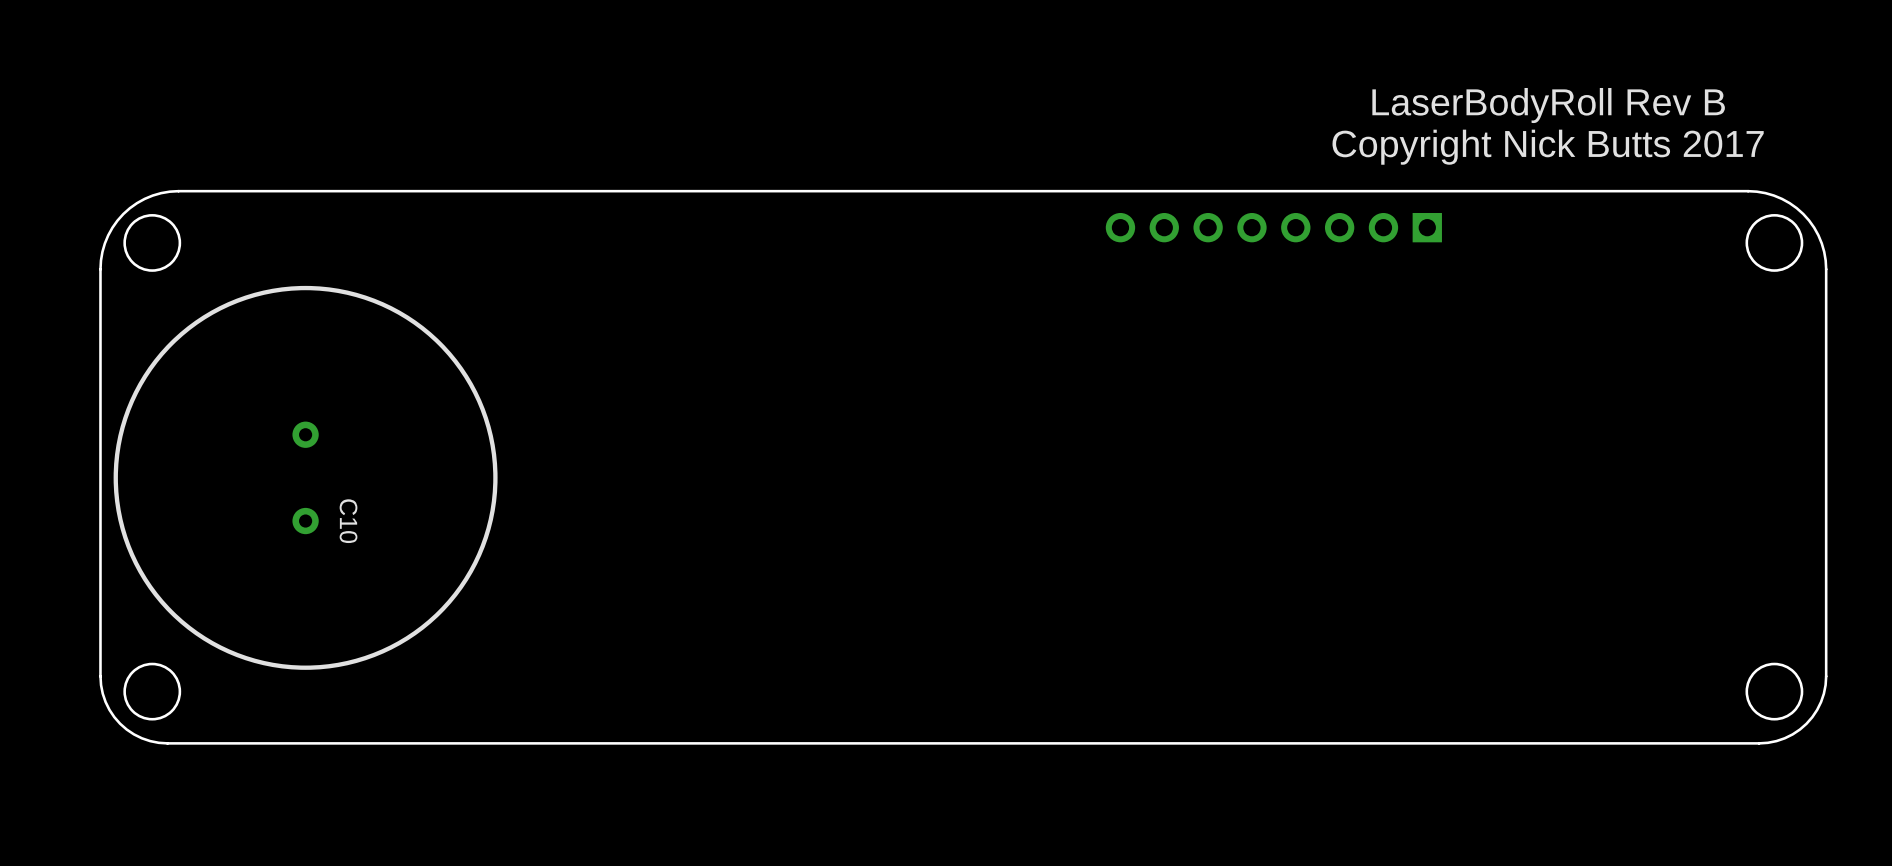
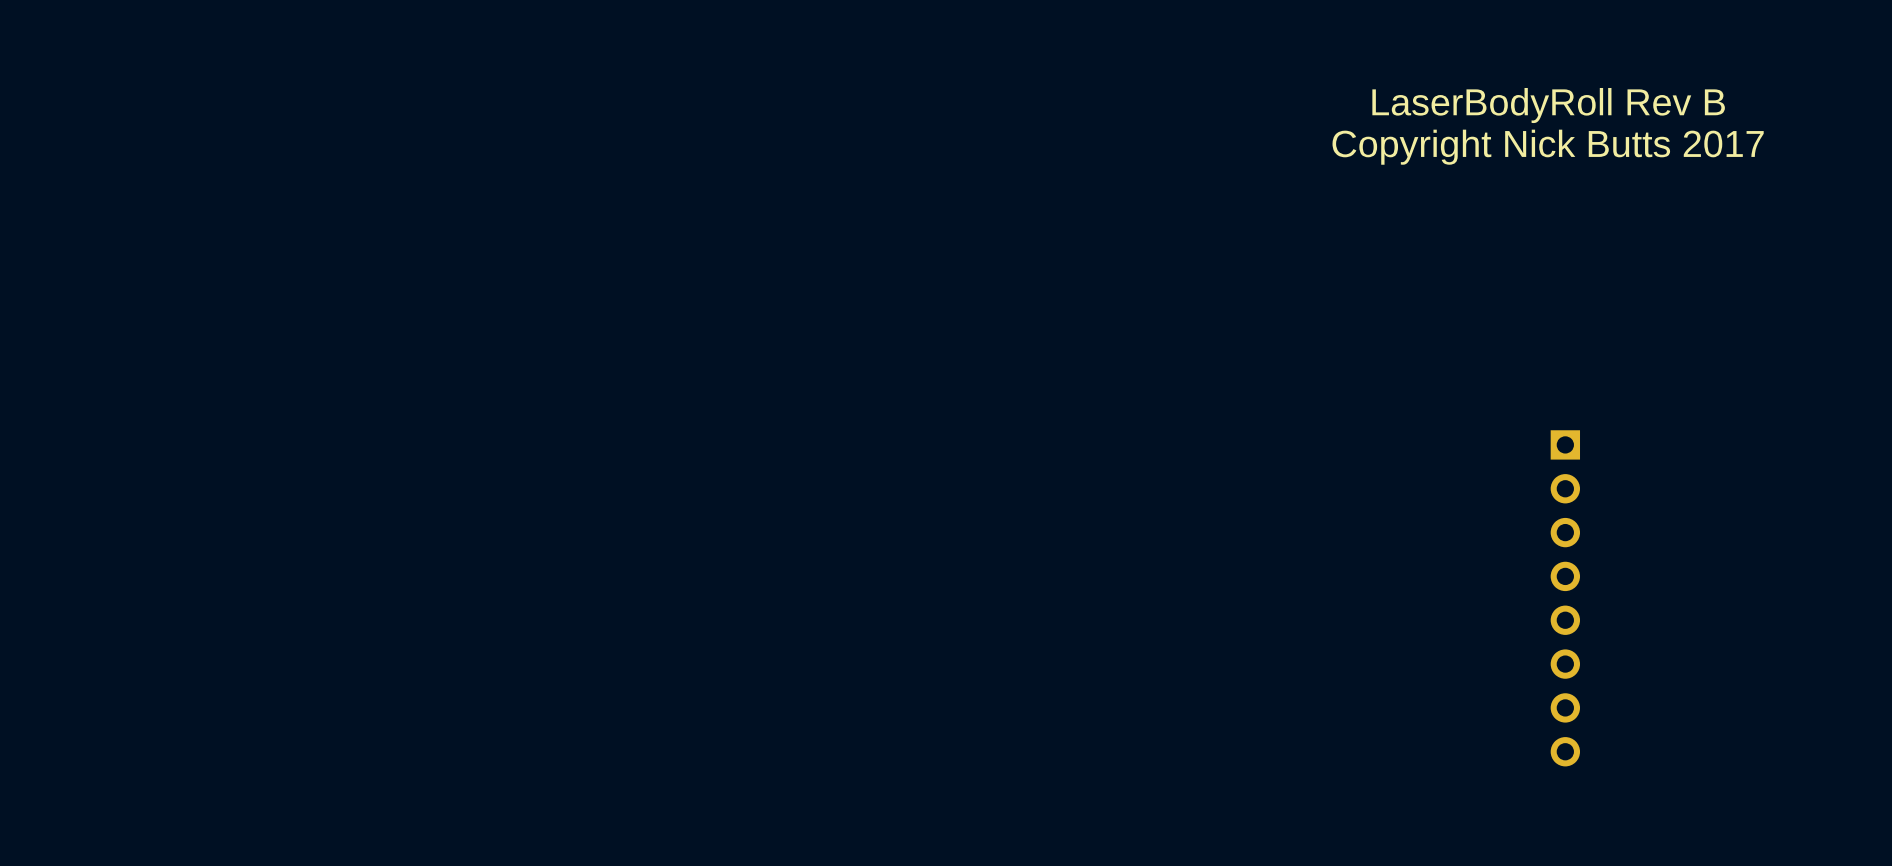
board edge: (1748, 191) (178, 191) (152, 195) (129, 208) (117, 220) (108, 235) (100, 260) (100, 676) (102, 693) (114, 717) (126, 729) (150, 741) (167, 743) (1759, 743) (1776, 741) (1792, 734) (1812, 717) (1821, 701) (1825, 685) (1826, 269) (1824, 251) (1818, 235) (1803, 214) (1789, 203) (1773, 195) (1748, 191) -> none
round board edge: [123, 214, 182, 272] -> none
round board edge: [1745, 214, 1804, 272] -> none
part: (1273, 227) -> none
C10: (305, 477) -> none
part: none -> (1565, 598)
round board edge: [123, 662, 182, 721] -> none
round board edge: [1745, 662, 1804, 721] -> none

